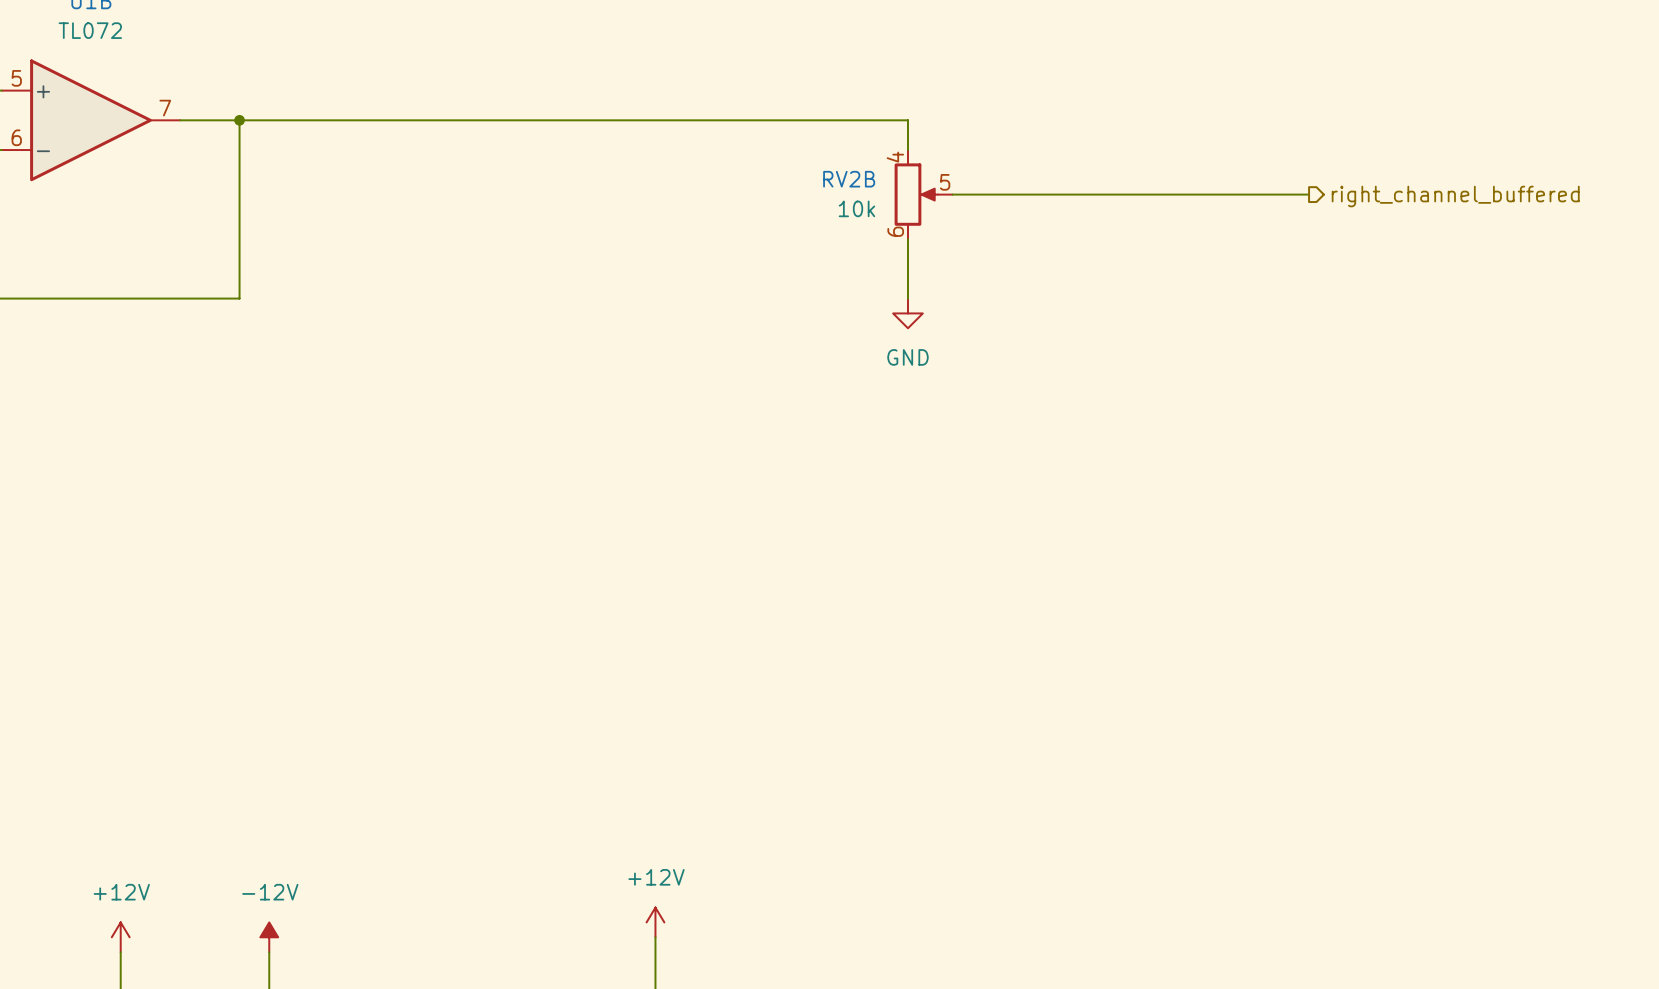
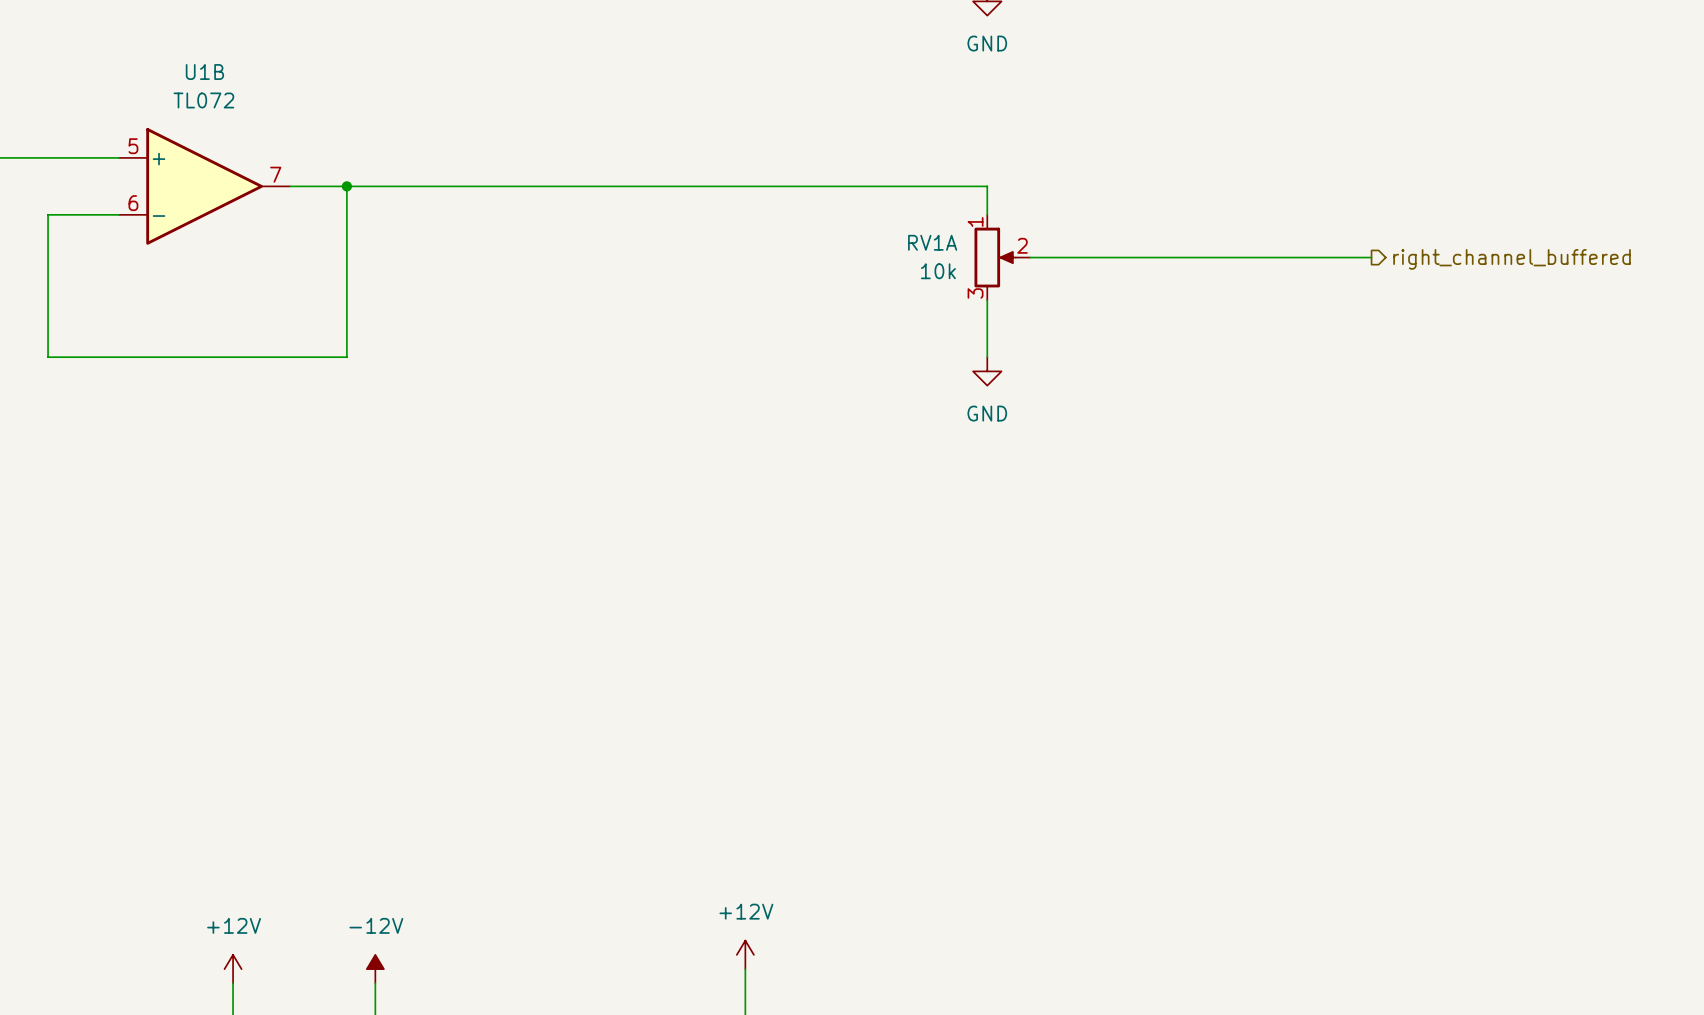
RV2B pin number: 4 (895, 157) -> 1 (975, 221)
RV2B name: RV2B (849, 179) -> RV1A (932, 242)
RV2B pin number: 5 (945, 182) -> 2 (1022, 245)
RV2B pin number: 6 (895, 231) -> 3 (975, 293)

